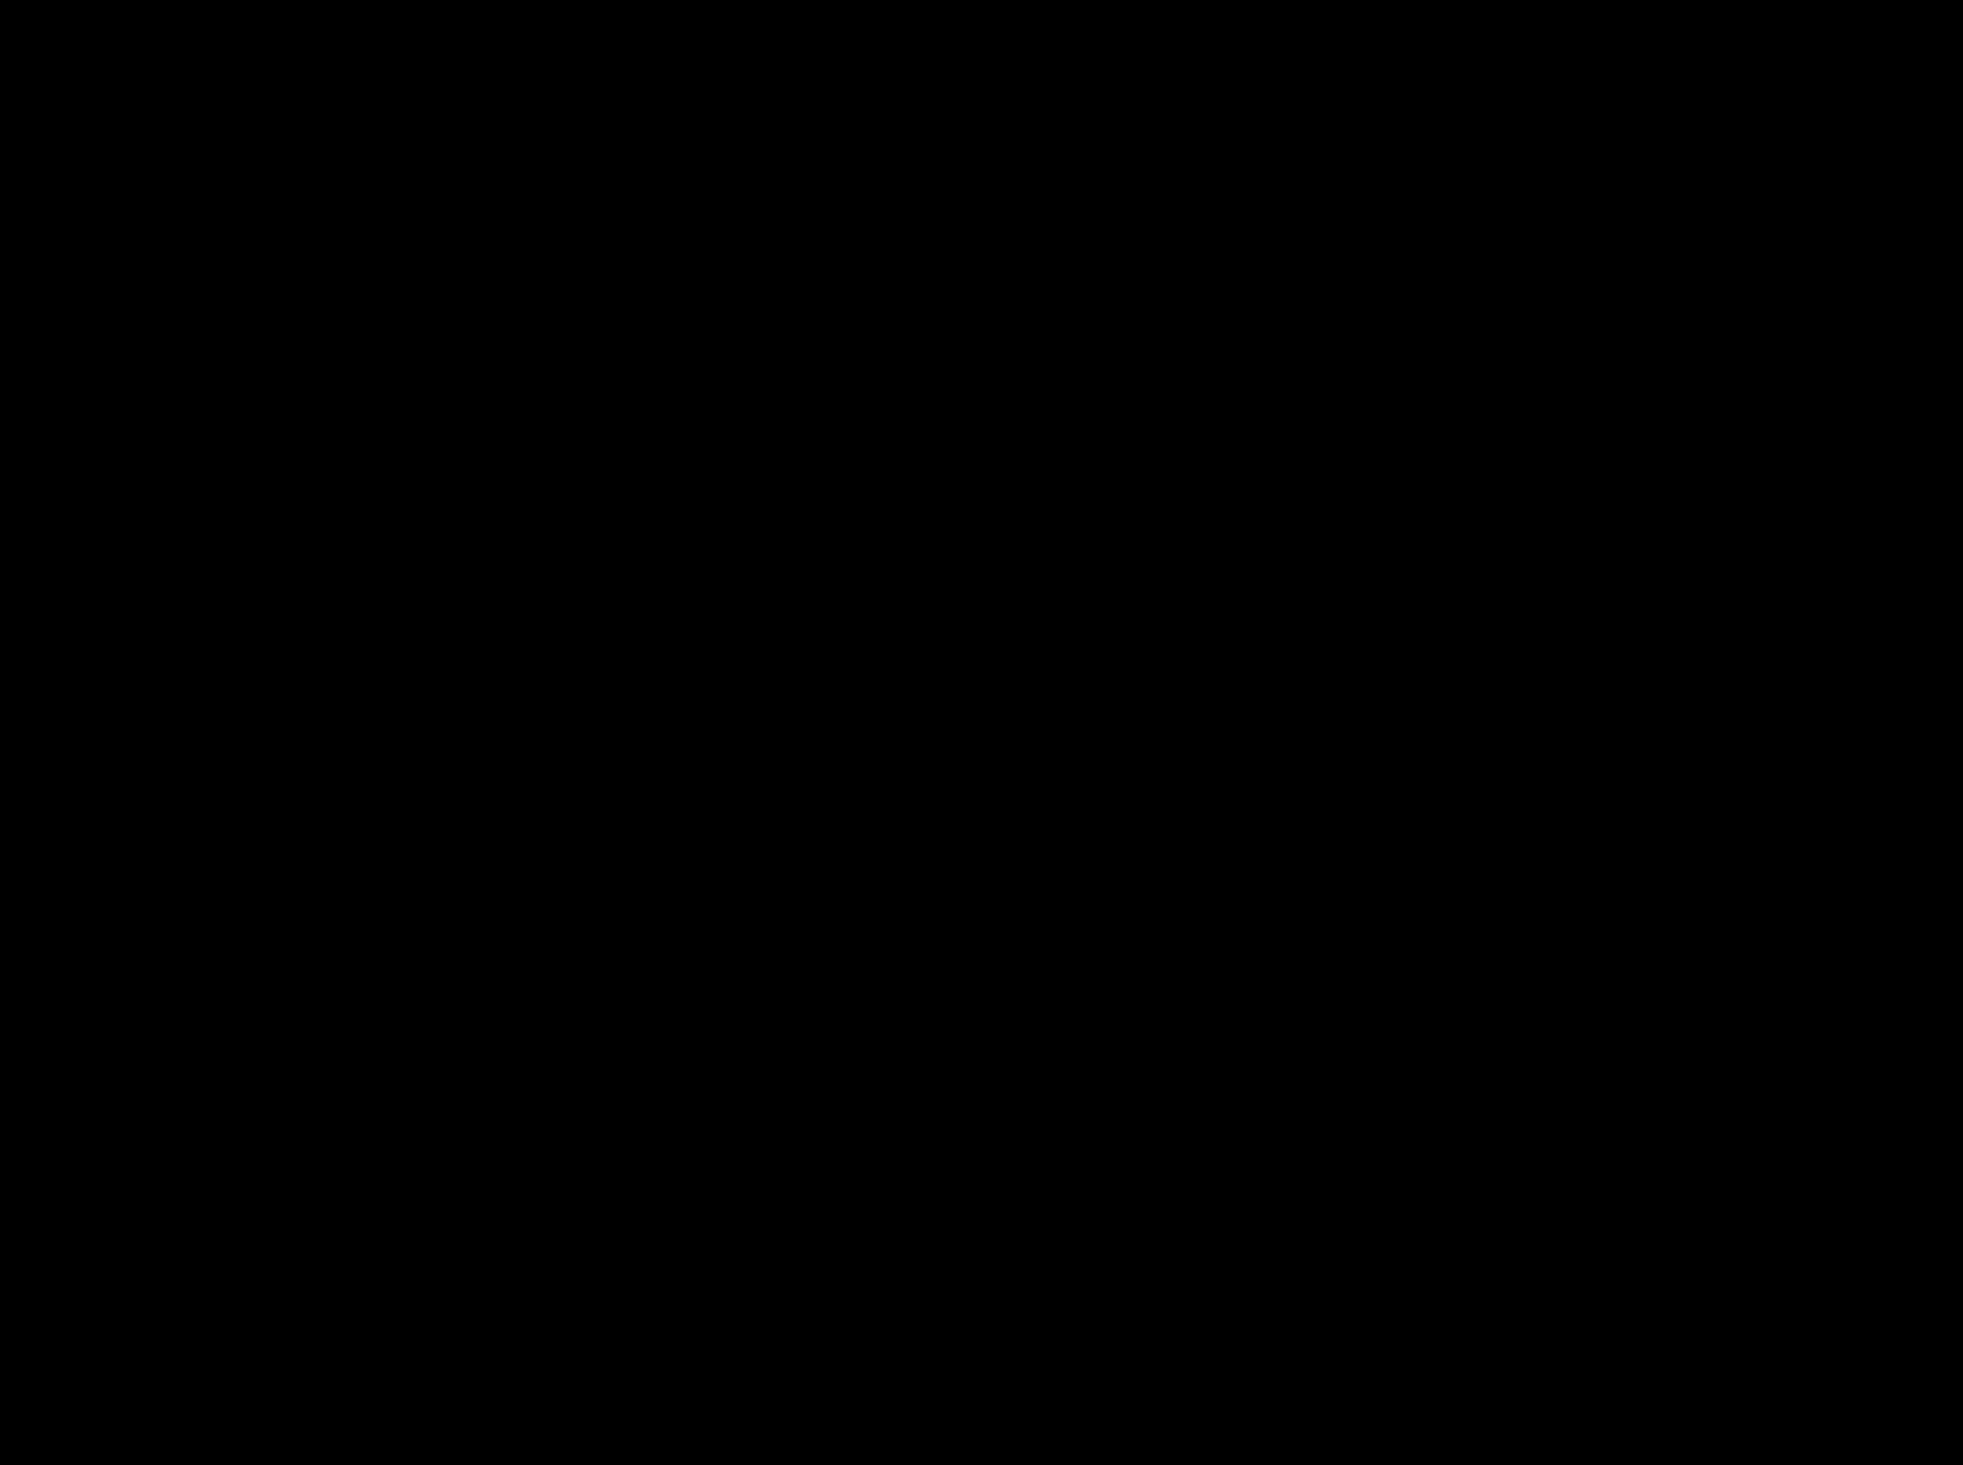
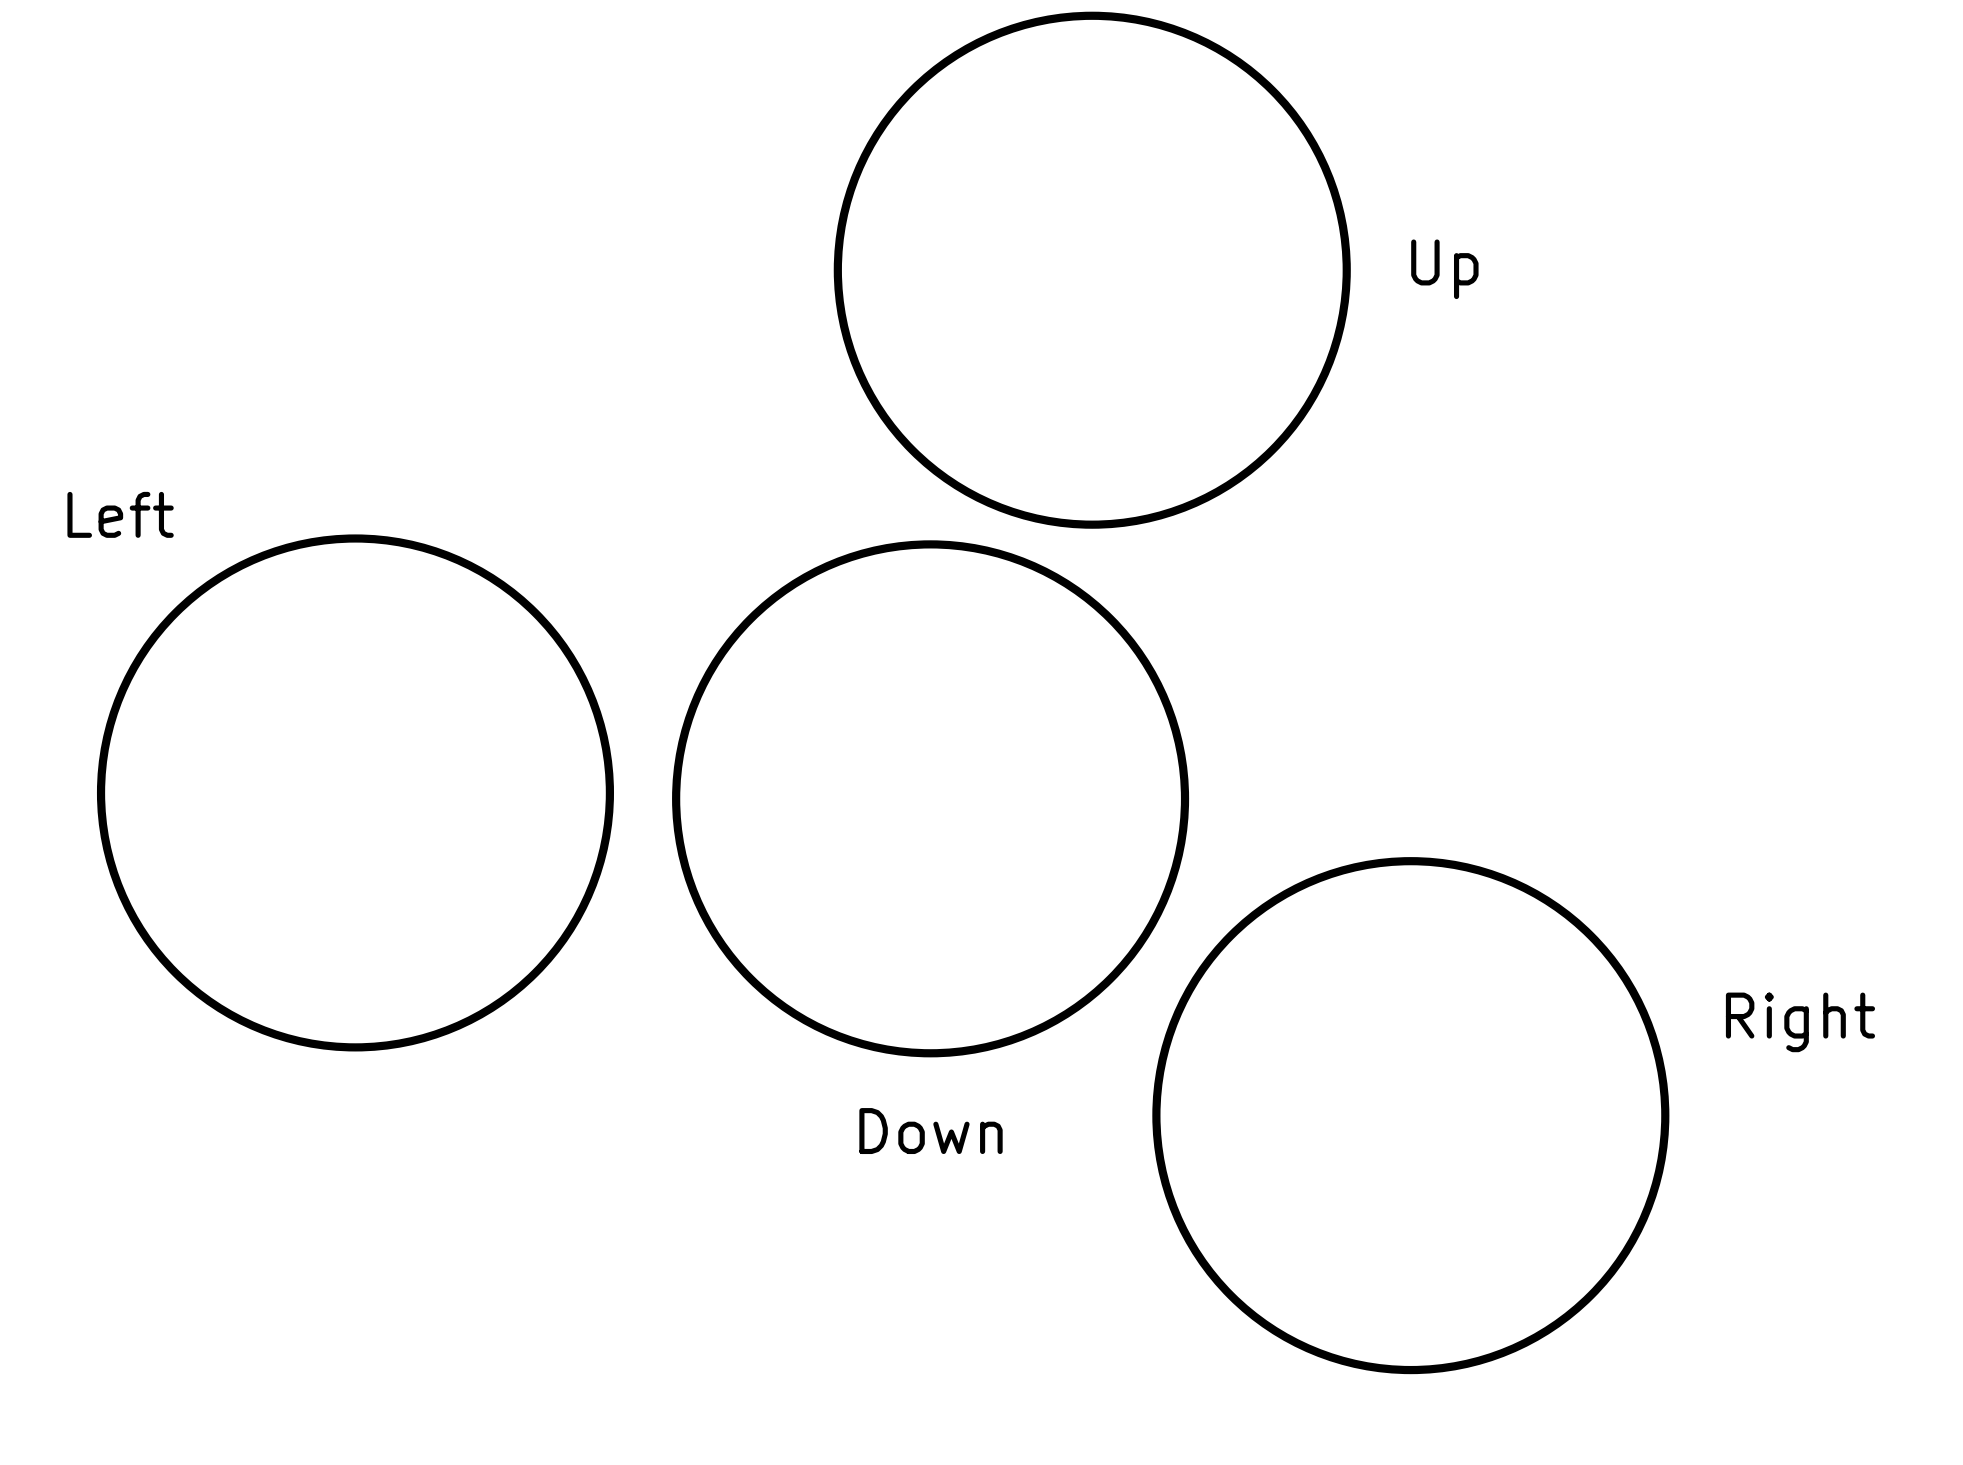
drawing: none -> [672, 11, 1670, 1375]
text: none -> Up (1444, 269)
text: none -> Left (120, 514)
drawing: none -> [96, 534, 615, 1052]
text: none -> Right (1800, 1022)
text: none -> Down (931, 1131)

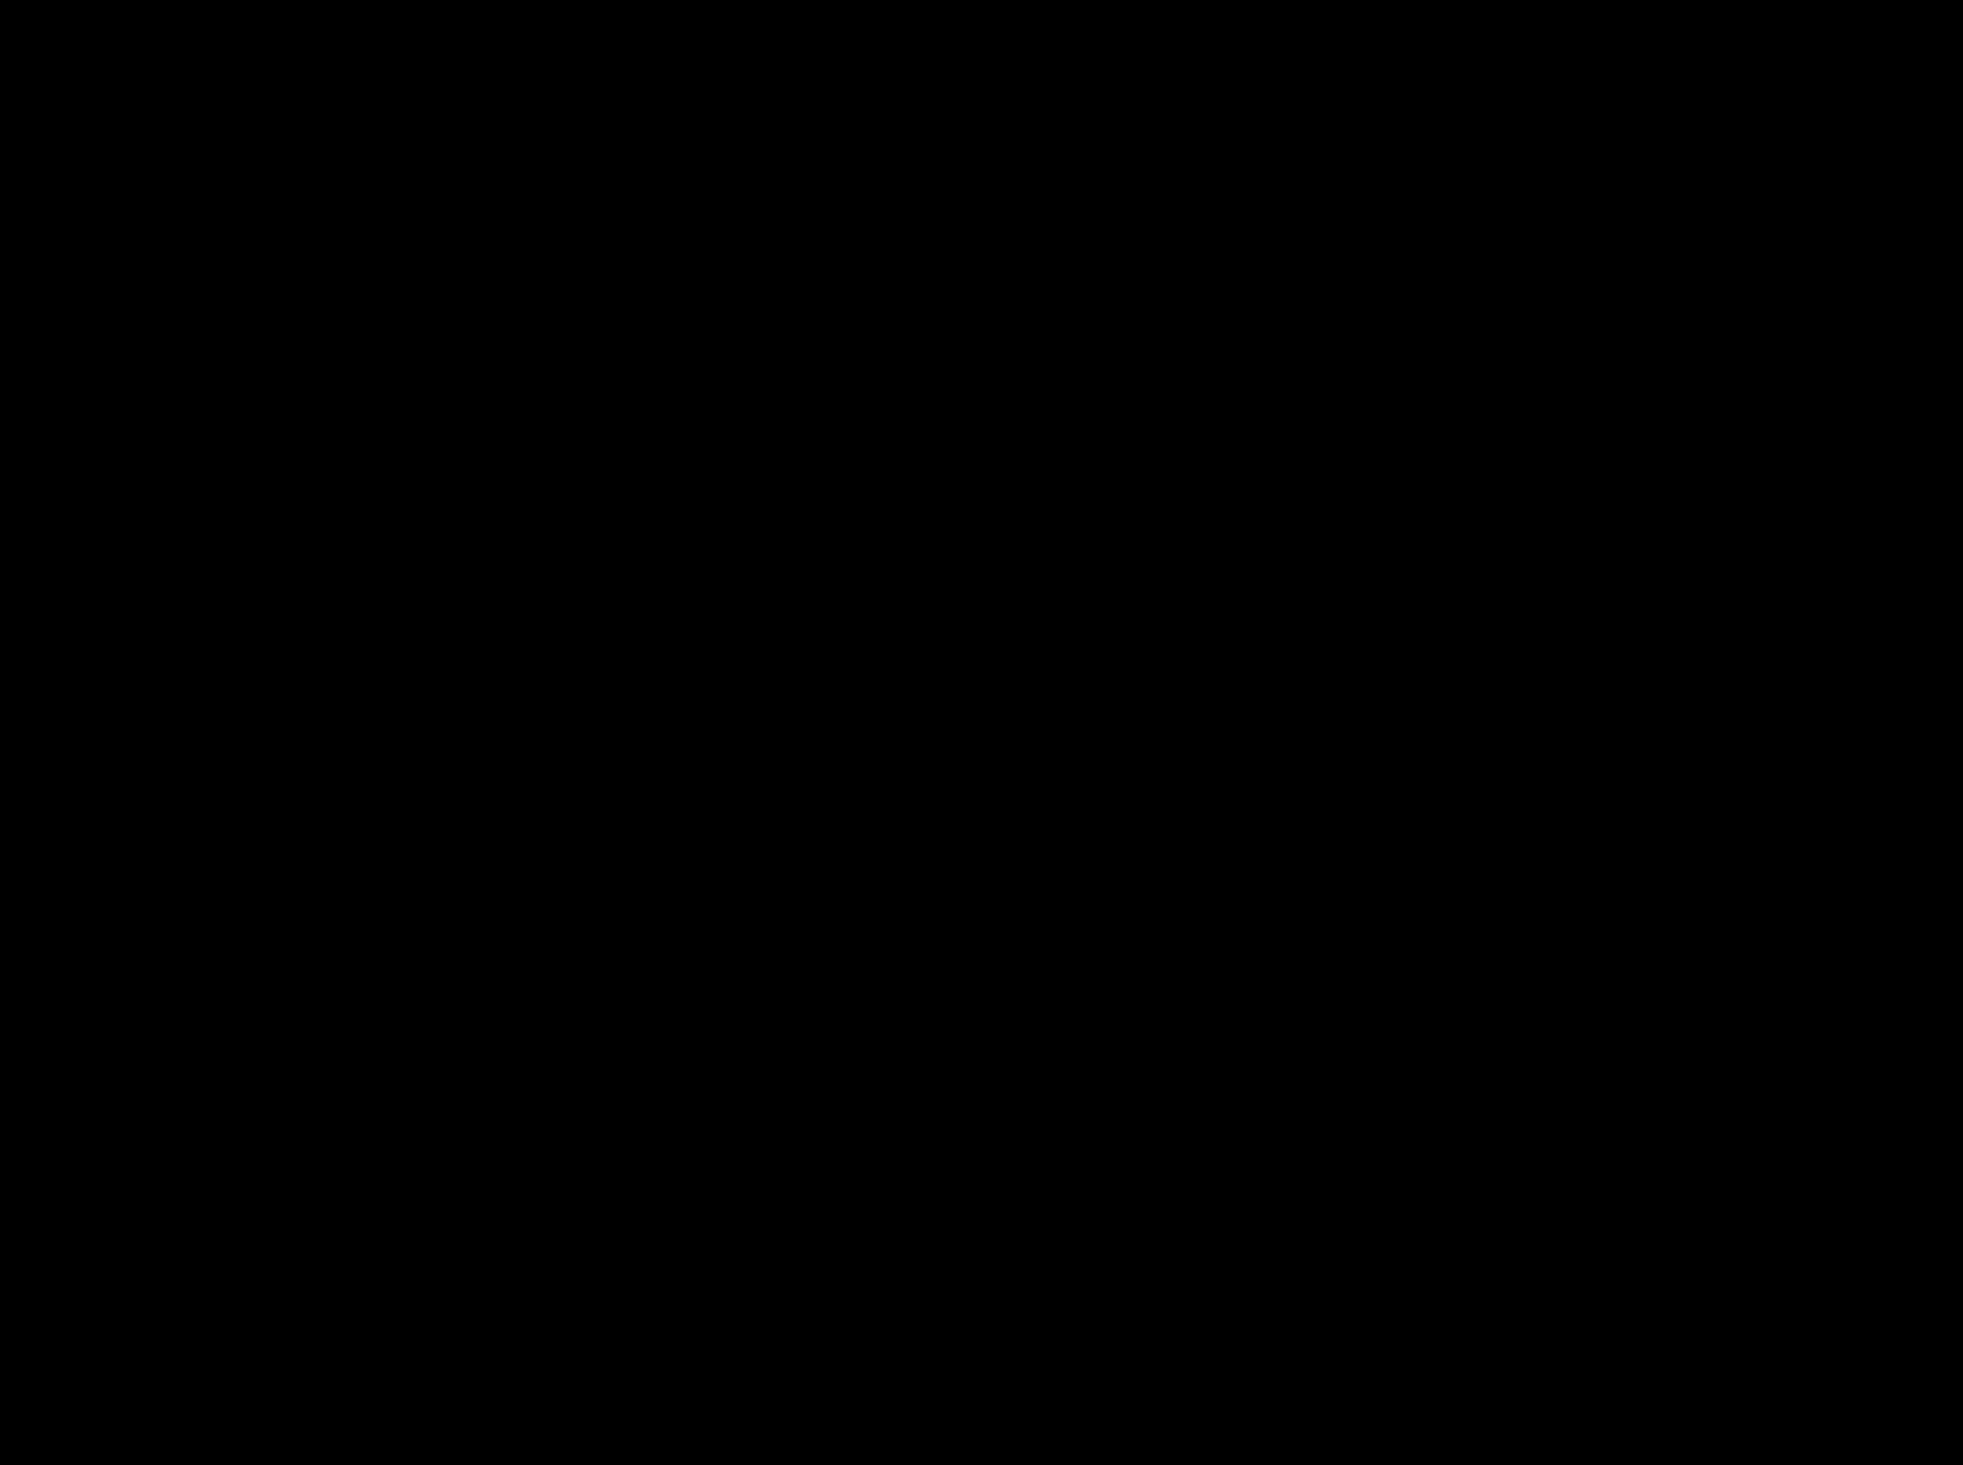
drawing: [672, 11, 1670, 1375] -> none
text: Up (1444, 269) -> none
text: Left (120, 514) -> none
drawing: [96, 534, 615, 1052] -> none
text: Right (1800, 1022) -> none
text: Down (931, 1131) -> none

